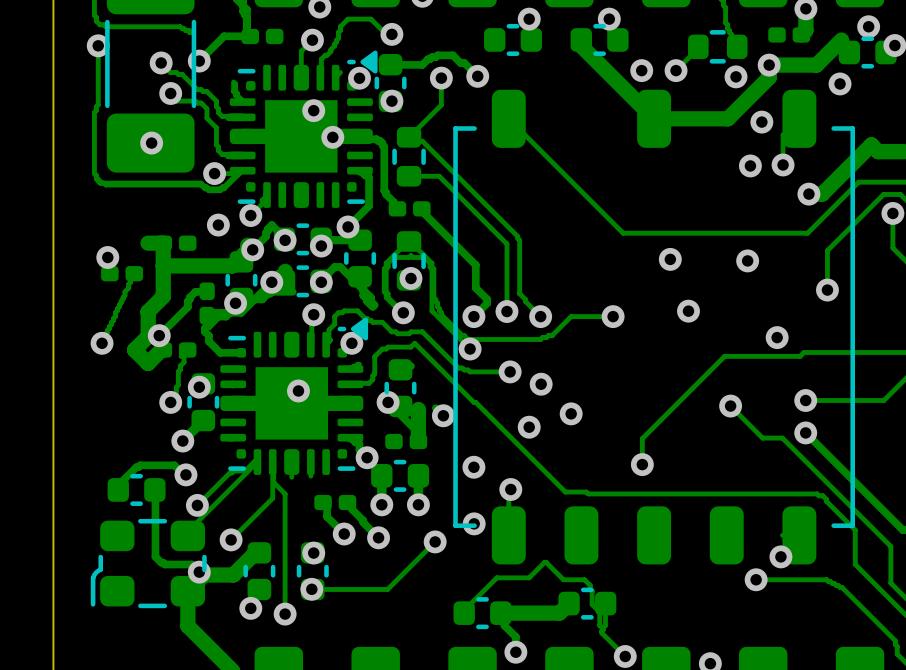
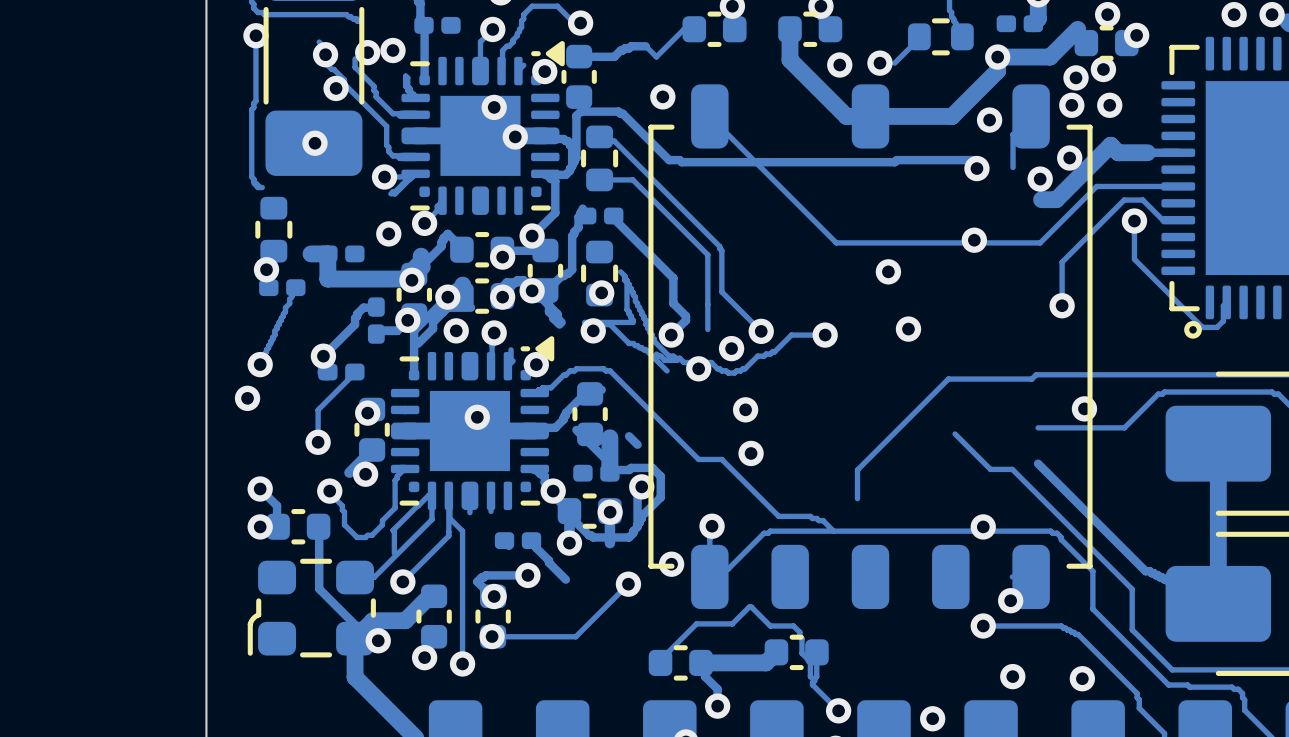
track: (250, 36) (224, 36) (199, 61) -> (424, 25) (424, 80)
track: (581, 46) (654, 118) -> (789, 35) (789, 59) (846, 116) (870, 116)
track: (450, 55) (460, 62) (464, 62) (477, 76) -> (645, 46) (656, 56) (684, 29) (694, 29)
via: none -> (393, 50)
track: (161, 62) (170, 72) (182, 74) (197, 89) (206, 91) (216, 101) (218, 112) -> (355, 58) (355, 67) (374, 86) (376, 96) (388, 109)
via: (641, 70) -> none
via: none -> (879, 63)
via: (676, 70) -> none
via: none -> (839, 65)
via: (477, 76) -> none
via: (736, 76) -> none
via: none -> (1103, 69)
track: (441, 78) (441, 105) (409, 137) -> none
via: (441, 78) -> none
track: (170, 93) (176, 101) (201, 103) (206, 108) (206, 118) -> (319, 42) (327, 50) (327, 65) (344, 80) (344, 84) (376, 115)
via: (391, 101) -> none
via: none -> (662, 96)
via: none -> (1071, 105)
via: none -> (1109, 105)
via: none -> (1069, 158)
track: none -> (976, 160) (896, 160) (894, 162) (681, 162) (679, 160) (669, 160) (622, 113) (618, 111) (580, 111) (576, 115) (576, 158) (572, 164)
track: (384, 164) (384, 190) (393, 202) -> (572, 166) (565, 174) (546, 174)
via: (783, 164) -> none
track: (222, 188) (220, 190) (208, 190) (201, 185) (105, 185) (103, 183) (201, 183) (208, 188) (220, 188) -> none
via position: (808, 194) -> (1040, 179)
track: none -> (582, 210) (578, 217) (578, 227) (572, 236) (572, 269) (567, 273) (561, 276) (555, 282) (506, 282) (496, 292)
part: none -> (273, 229)
via: (285, 240) -> none
via position: (252, 249) -> (411, 280)
track: (428, 259) (410, 242) (407, 242) (386, 263) (384, 268) (384, 291) (386, 297) (395, 305) (388, 297) (386, 291) (386, 268) (391, 259) (410, 255) (426, 259) (431, 268) (431, 310) (451, 329) -> (586, 322) (589, 324) (610, 324) (629, 343) (645, 349)
via position: (747, 260) -> (974, 240)
track: (163, 265) (163, 296) (148, 311) -> none
via: none -> (532, 290)
track: (519, 277) (519, 293) (540, 316) -> (721, 291) (761, 331)
track: none -> (447, 295) (447, 301) (443, 311) (433, 322) (433, 328) (418, 343)
track: (433, 293) (441, 314) (460, 333) -> (627, 309) (633, 322)
track: none -> (632, 322) (584, 322)
via: (506, 311) -> none
track: (148, 312) (148, 336) (134, 349) (148, 363) (161, 349) -> none
track: (241, 312) (229, 312) (226, 316) (218, 316) (205, 328) (205, 331) (208, 335) (208, 341) (220, 352) (241, 352) -> (414, 330) (414, 375)
via: none -> (456, 330)
via: none -> (761, 331)
via: (540, 316) -> none
track: (582, 316) (571, 316) (552, 335) (540, 339) (479, 339) -> (791, 335) (774, 351) (764, 356) (757, 356) (745, 368) (734, 373) (721, 370) (711, 362) (683, 362) (679, 358) (669, 356) (654, 341) (635, 301) (635, 297) (624, 278)
via: none -> (731, 348)
track: (328, 329) (334, 324) (334, 316) (338, 312) (357, 310) (365, 318) (372, 322) (382, 322) (391, 331) (397, 333) (422, 331) (458, 368) (470, 371) (510, 371) -> none
via: (777, 337) -> none
track: (410, 347) (414, 343) (565, 492) (586, 492) (588, 493) -> (601, 368) (610, 370) (698, 459) (721, 459) (778, 516) (810, 516) (823, 520) (833, 531)
via: none -> (698, 368)
via: (470, 349) -> none
track: (378, 352) (374, 356) (372, 379) (369, 383) (353, 383) (351, 385) -> (565, 375) (551, 387) (544, 387)
track: (184, 354) (184, 362) (178, 371) (176, 396) (170, 402) -> (350, 377) (318, 409) (318, 442)
track: none -> (589, 394) (582, 396) (565, 413) (563, 419) (555, 427) (540, 427)
via: (510, 371) -> none
via: none -> (247, 398)
via: none -> (1084, 408)
via: (805, 400) -> none
via position: (170, 402) -> (318, 442)
via: (388, 402) -> none
via: (730, 406) -> none
via: (571, 413) -> none
via: (443, 415) -> none
via position: (529, 427) -> (751, 453)
via: (805, 432) -> none
track: none -> (405, 470) (395, 480) (395, 507) (382, 520) (382, 524) (371, 535) (365, 537) (357, 537) (344, 524) (342, 505) (329, 491)
via: (182, 441) -> none
via: none -> (365, 474)
track: none -> (610, 474) (616, 470) (652, 467) (660, 476) (660, 497) (641, 516) (637, 524)
track: none -> (641, 486) (637, 491) (637, 526) (629, 537) (593, 537) (570, 514)
via: none -> (641, 486)
via: none -> (260, 488)
via: none -> (329, 491)
track: (257, 462) (187, 531) (187, 535) -> (432, 495) (432, 519) (374, 577) (355, 577)
via: (642, 464) -> none
via: (473, 467) -> none
track: (244, 471) (229, 472) (197, 505) -> (417, 505) (393, 530) (394, 553)
track: (185, 474) (174, 465) (140, 465) (117, 488) -> (260, 488) (277, 505) (277, 524)
via: (185, 474) -> none
via: none -> (610, 512)
via: none -> (260, 526)
via: none -> (983, 526)
track: none -> (797, 531) (770, 531) (764, 533) (728, 569) (709, 577)
via: (418, 504) -> none
via: (197, 505) -> none
track: (327, 507) (327, 516) (344, 534) -> none
track: none -> (521, 571) (517, 575) (485, 575) (481, 577) (477, 581) (494, 596)
via: (378, 537) -> none
track: (155, 546) (155, 556) (161, 562) (164, 564) (191, 564) (199, 572) -> (319, 588) (368, 638)
via position: (199, 572) -> (378, 640)
via: none -> (1012, 676)
via: none -> (1082, 678)

